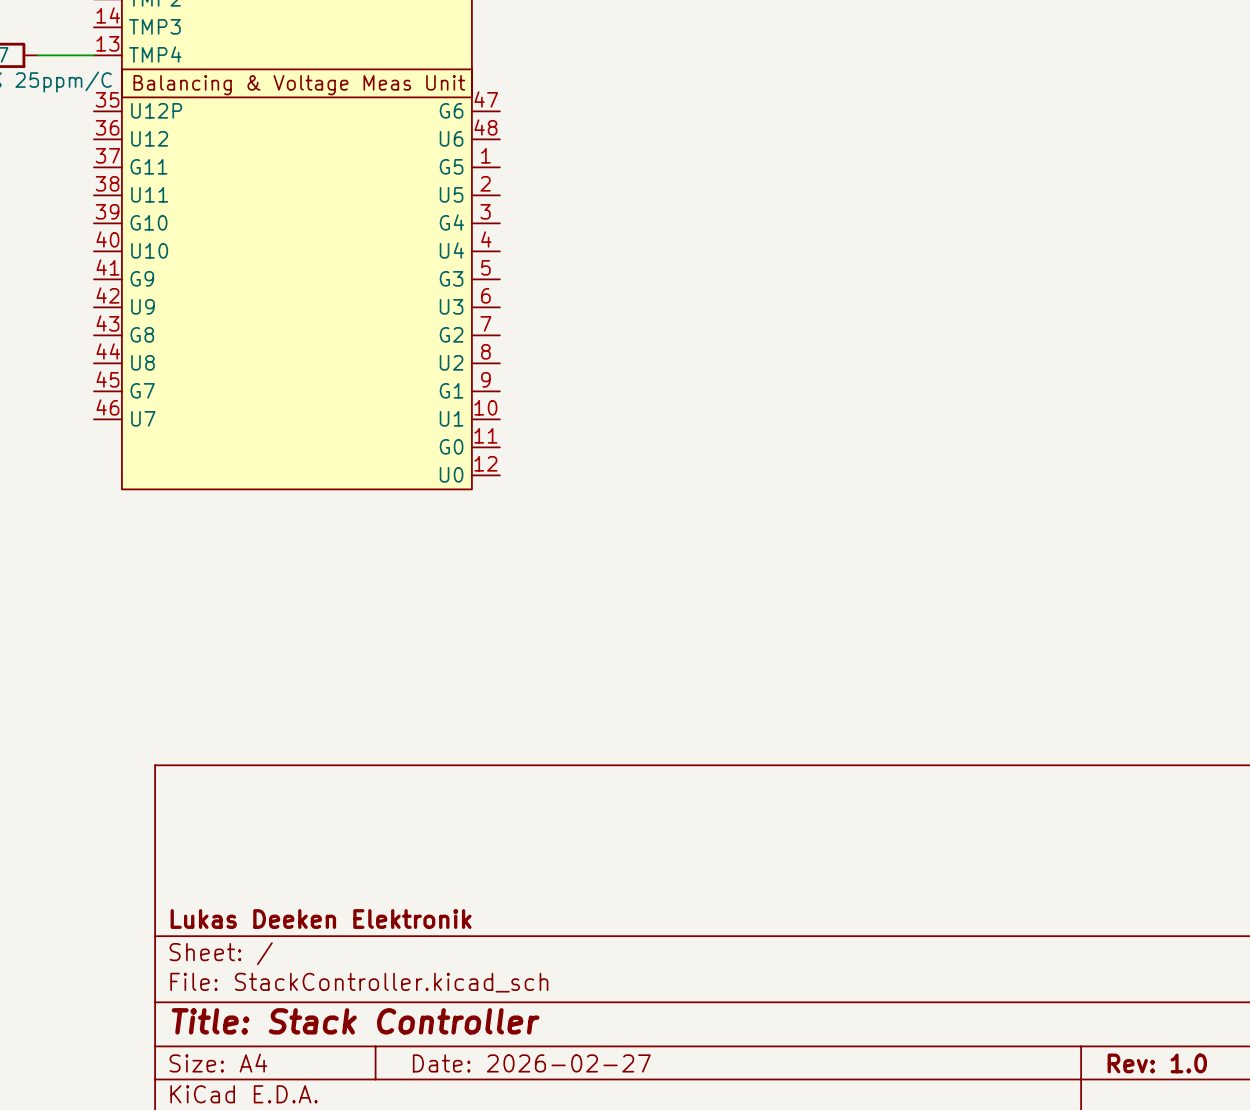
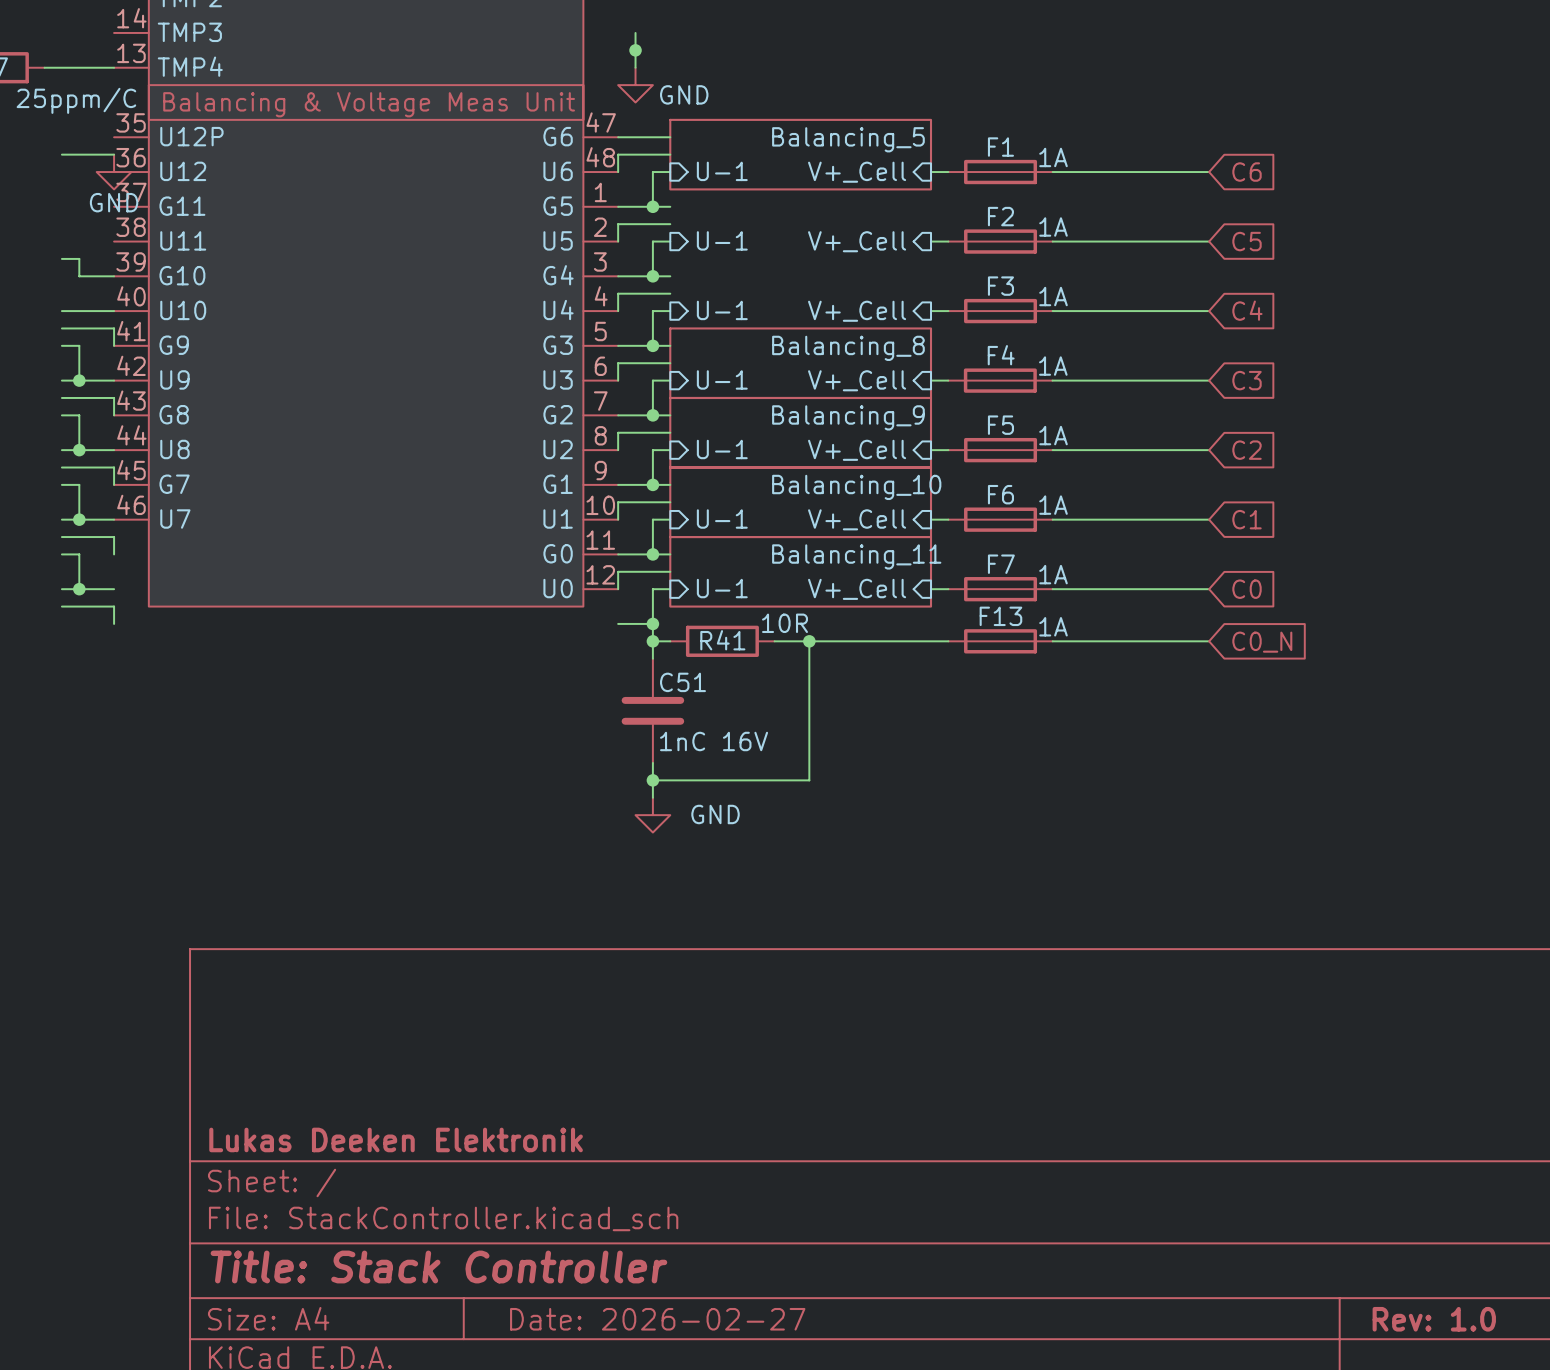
wire: none -> (635, 32) (635, 67)
junction: none -> (635, 50)
power symbol: none -> GND (635, 85)
wire: none -> (618, 137) (670, 137)
wire: none -> (61, 154) (114, 154)
wire: none -> (670, 154) (618, 154) (618, 172)
sheet Balancing_5: none -> (800, 154)
sheet pin: none -> U-1 (722, 171)
power symbol: none -> GND (114, 172)
wire: none -> (670, 172) (652, 172) (652, 206)
sheet pin: none -> V+_Cell (857, 172)
wire: none -> (931, 172) (948, 172)
F1: none -> 1A (1000, 172)
wire: none -> (1052, 172) (1209, 172)
global label: none -> C6 (1247, 172)
wire: none -> (618, 206) (670, 206)
junction: none -> (652, 206)
wire: none -> (670, 224) (618, 224) (618, 241)
sheet pin: none -> U-1 (722, 240)
wire: none -> (670, 241) (652, 241) (652, 276)
sheet pin: none -> V+_Cell (857, 241)
wire: none -> (931, 241) (948, 241)
F2: none -> 1A (1000, 241)
wire: none -> (1052, 241) (1209, 241)
global label: none -> C5 (1247, 241)
wire: none -> (61, 258) (79, 258) (79, 276) (114, 276)
wire: none -> (618, 276) (670, 276)
junction: none -> (652, 276)
wire: none -> (670, 293) (618, 293) (618, 311)
sheet pin: none -> U-1 (722, 310)
wire: none -> (61, 311) (114, 311)
wire: none -> (670, 311) (652, 311) (652, 345)
sheet pin: none -> V+_Cell (857, 311)
wire: none -> (931, 311) (948, 311)
F3: none -> 1A (1000, 311)
wire: none -> (1052, 311) (1209, 311)
global label: none -> C4 (1247, 310)
wire: none -> (61, 328) (114, 328) (114, 345)
wire: none -> (61, 345) (79, 345) (79, 380)
wire: none -> (618, 345) (670, 345)
junction: none -> (652, 345)
wire: none -> (670, 363) (618, 363) (618, 380)
sheet Balancing_8: none -> (800, 363)
sheet pin: none -> U-1 (722, 379)
wire: none -> (61, 380) (114, 380)
junction: none -> (79, 380)
wire: none -> (670, 380) (652, 380) (652, 415)
sheet pin: none -> V+_Cell (857, 380)
wire: none -> (931, 380) (948, 380)
F4: none -> 1A (1000, 380)
wire: none -> (1052, 380) (1209, 380)
global label: none -> C3 (1247, 380)
wire: none -> (61, 397) (114, 397) (114, 415)
wire: none -> (61, 415) (79, 415) (79, 450)
wire: none -> (618, 415) (670, 415)
junction: none -> (652, 415)
wire: none -> (670, 432) (618, 432) (618, 450)
sheet Balancing_9: none -> (800, 432)
sheet pin: none -> U-1 (722, 449)
wire: none -> (61, 450) (114, 450)
junction: none -> (79, 450)
wire: none -> (670, 450) (652, 450) (652, 484)
sheet pin: none -> V+_Cell (857, 450)
wire: none -> (931, 450) (948, 450)
F5: none -> 1A (1000, 450)
wire: none -> (1052, 450) (1209, 450)
global label: none -> C2 (1247, 450)
wire: none -> (61, 467) (114, 467) (114, 484)
wire: none -> (61, 484) (79, 484) (79, 519)
wire: none -> (618, 484) (670, 484)
junction: none -> (652, 484)
wire: none -> (670, 502) (618, 502) (618, 519)
sheet Balancing_10: none -> (800, 502)
sheet pin: none -> U-1 (722, 519)
wire: none -> (61, 519) (114, 519)
junction: none -> (79, 519)
wire: none -> (670, 519) (652, 519) (652, 554)
sheet pin: none -> V+_Cell (857, 519)
wire: none -> (931, 519) (948, 519)
F6: none -> 1A (1000, 519)
wire: none -> (1052, 519) (1209, 519)
global label: none -> C1 (1247, 519)
wire: none -> (61, 537) (114, 537) (114, 554)
wire: none -> (61, 554) (79, 554) (79, 589)
wire: none -> (618, 554) (670, 554)
junction: none -> (652, 554)
wire: none -> (670, 571) (618, 571) (618, 589)
sheet Balancing_11: none -> (800, 571)
sheet pin: none -> U-1 (722, 588)
wire: none -> (61, 589) (114, 589)
junction: none -> (79, 589)
wire: none -> (670, 589) (652, 589) (652, 658)
sheet pin: none -> V+_Cell (857, 589)
wire: none -> (931, 589) (948, 589)
F7: none -> 1A (1000, 589)
wire: none -> (1052, 589) (1209, 589)
global label: none -> C0 (1247, 589)
wire: none -> (61, 606) (114, 606) (114, 623)
wire: none -> (618, 623) (652, 623)
junction: none -> (652, 623)
wire: none -> (652, 641) (670, 641)
junction: none -> (652, 641)
R41: none -> 10R (722, 641)
wire: none -> (774, 641) (948, 641)
wire: none -> (809, 641) (809, 780) (652, 780)
junction: none -> (809, 641)
F13: none -> 1A (1000, 641)
wire: none -> (1052, 641) (1209, 641)
global label: none -> C0_N (1262, 642)
C51: none -> 1nC 16V (652, 710)
wire: none -> (652, 763) (652, 797)
junction: none -> (652, 780)
power symbol: none -> GND (652, 815)

